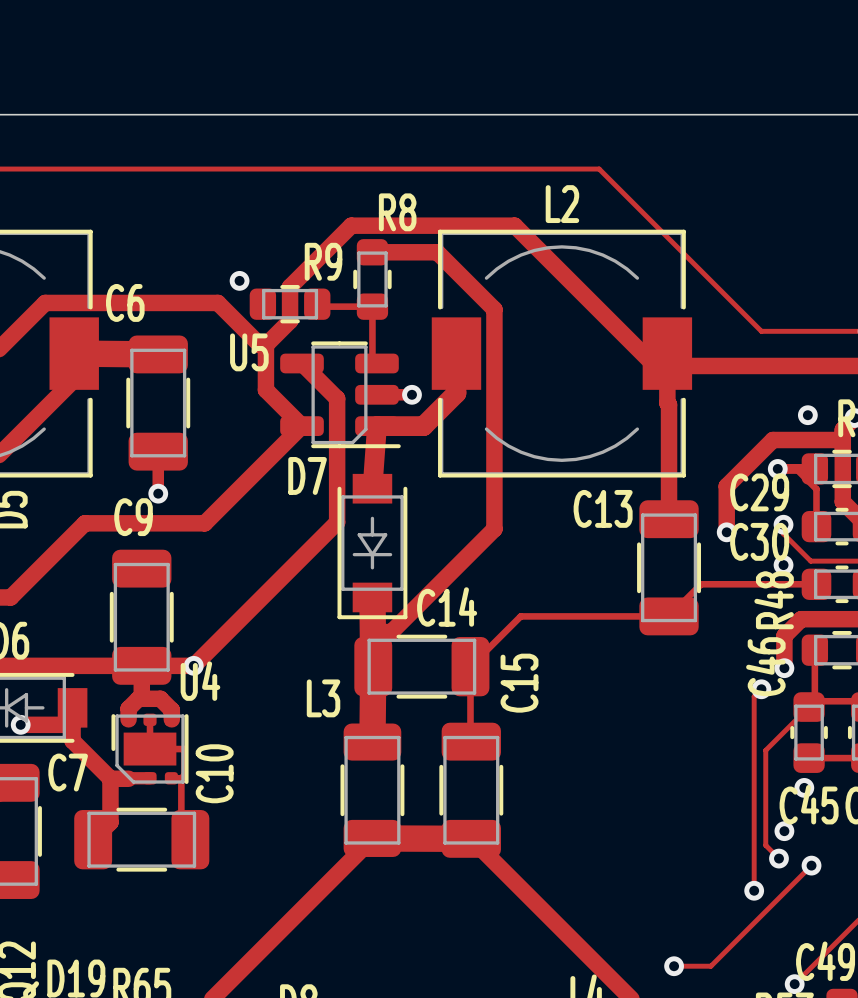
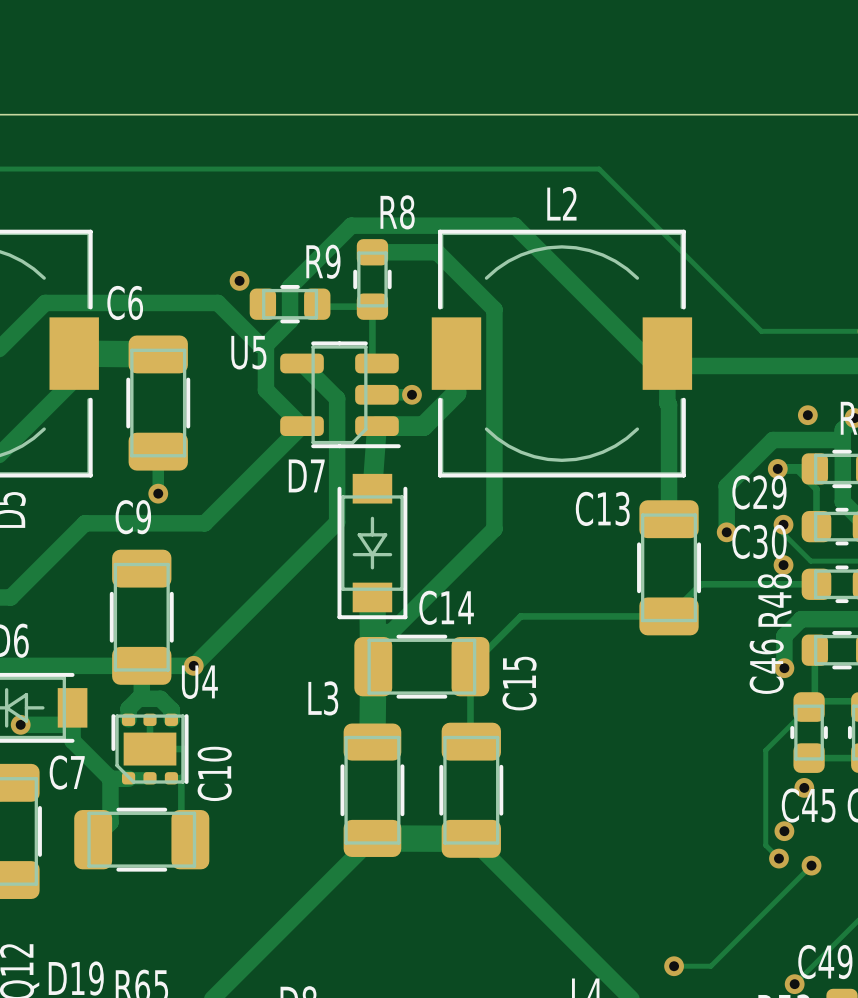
track: (761, 689) (754, 696) (754, 890) -> none
via: (761, 689) -> none
via: (754, 890) -> none

